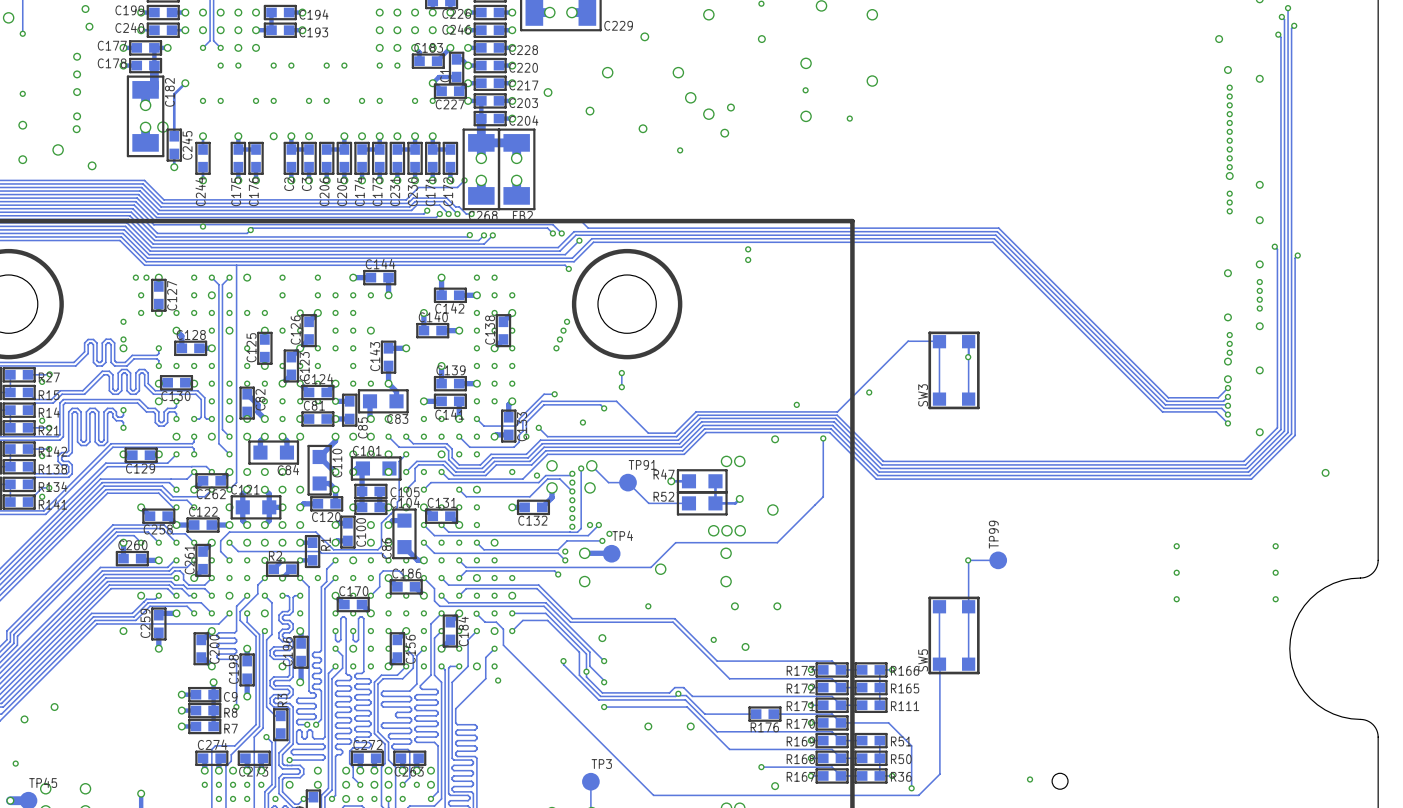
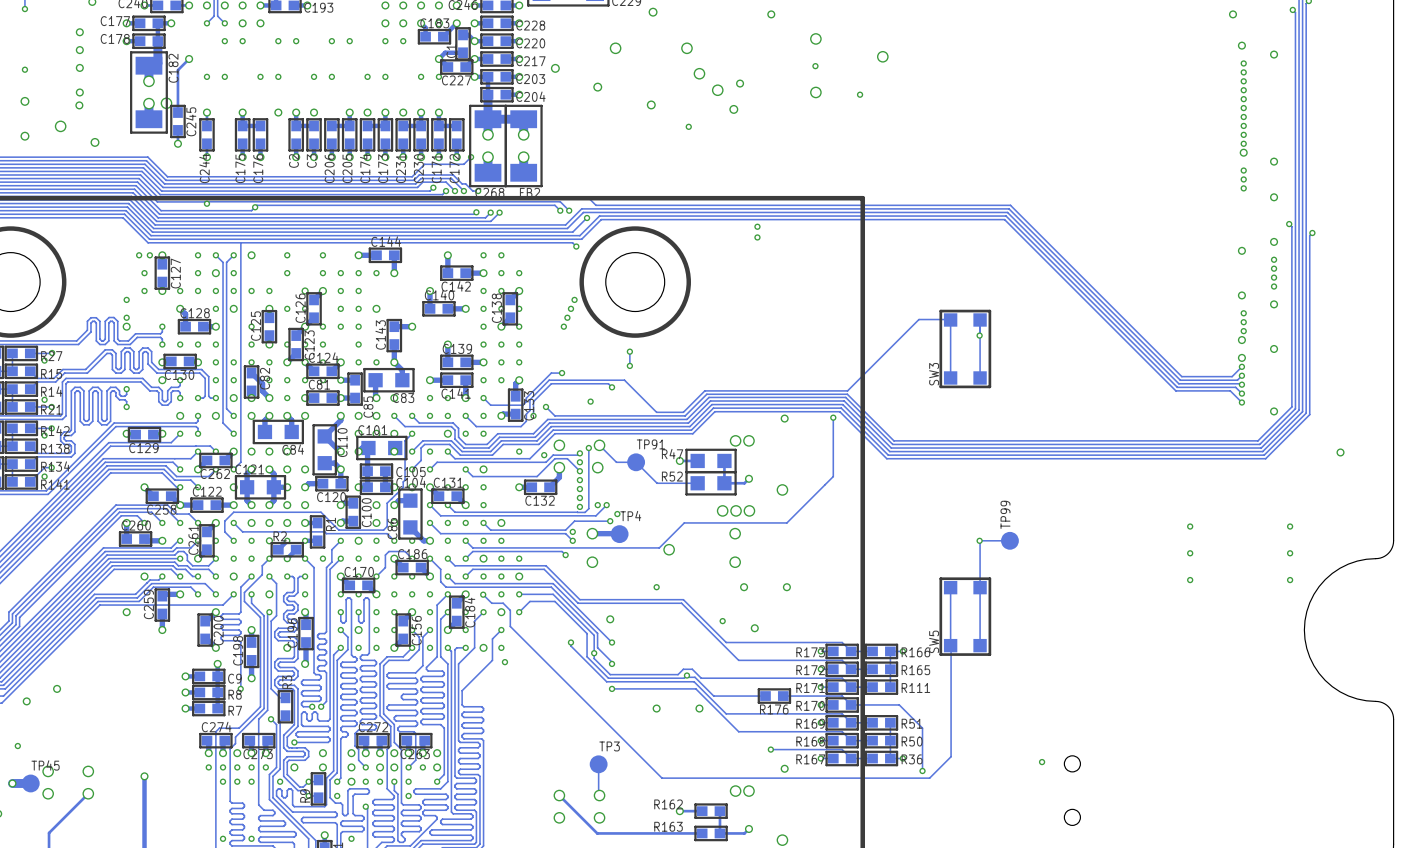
via: (869, 392) -> none
via: (796, 404) -> none

